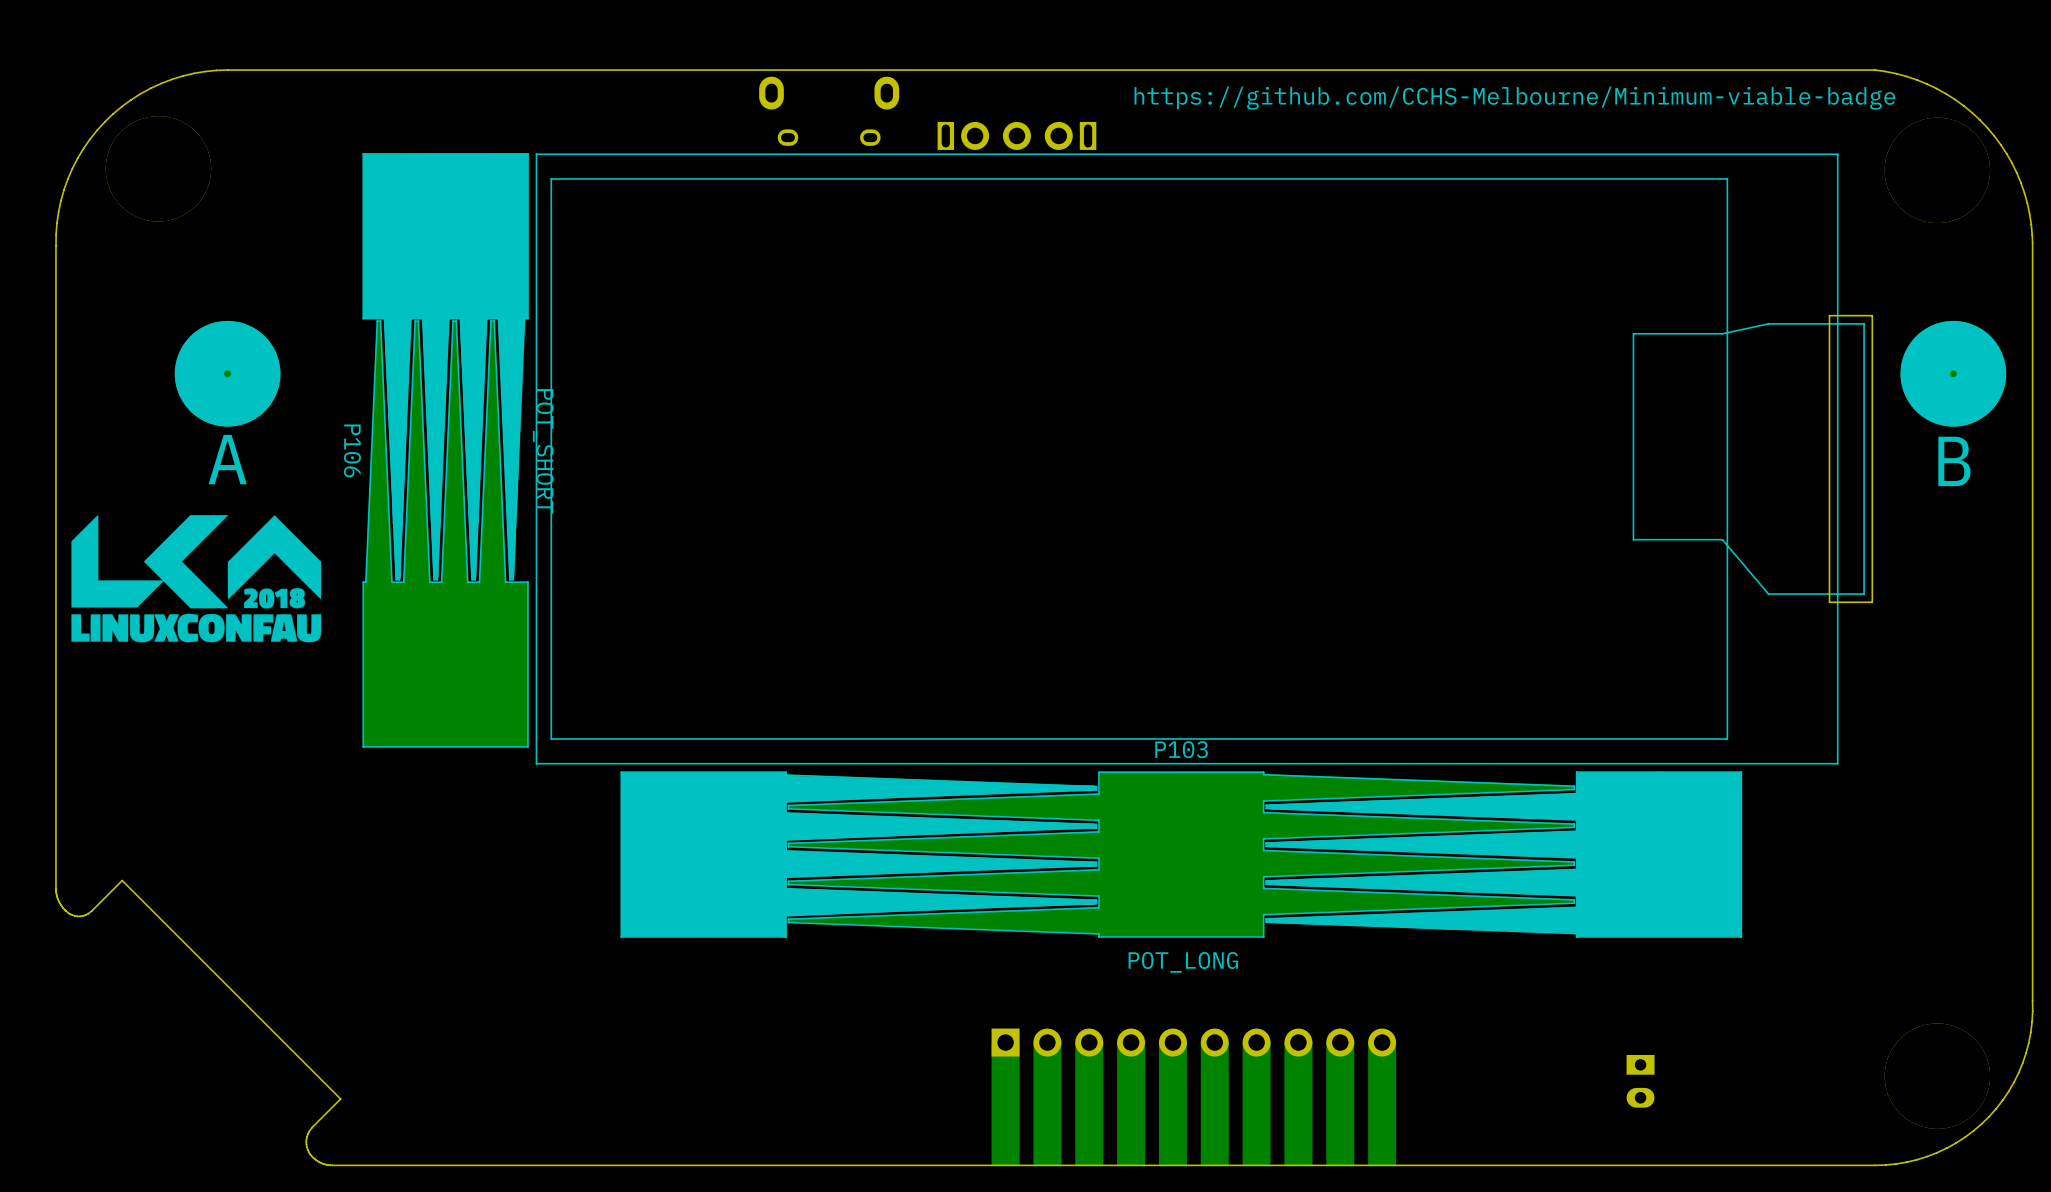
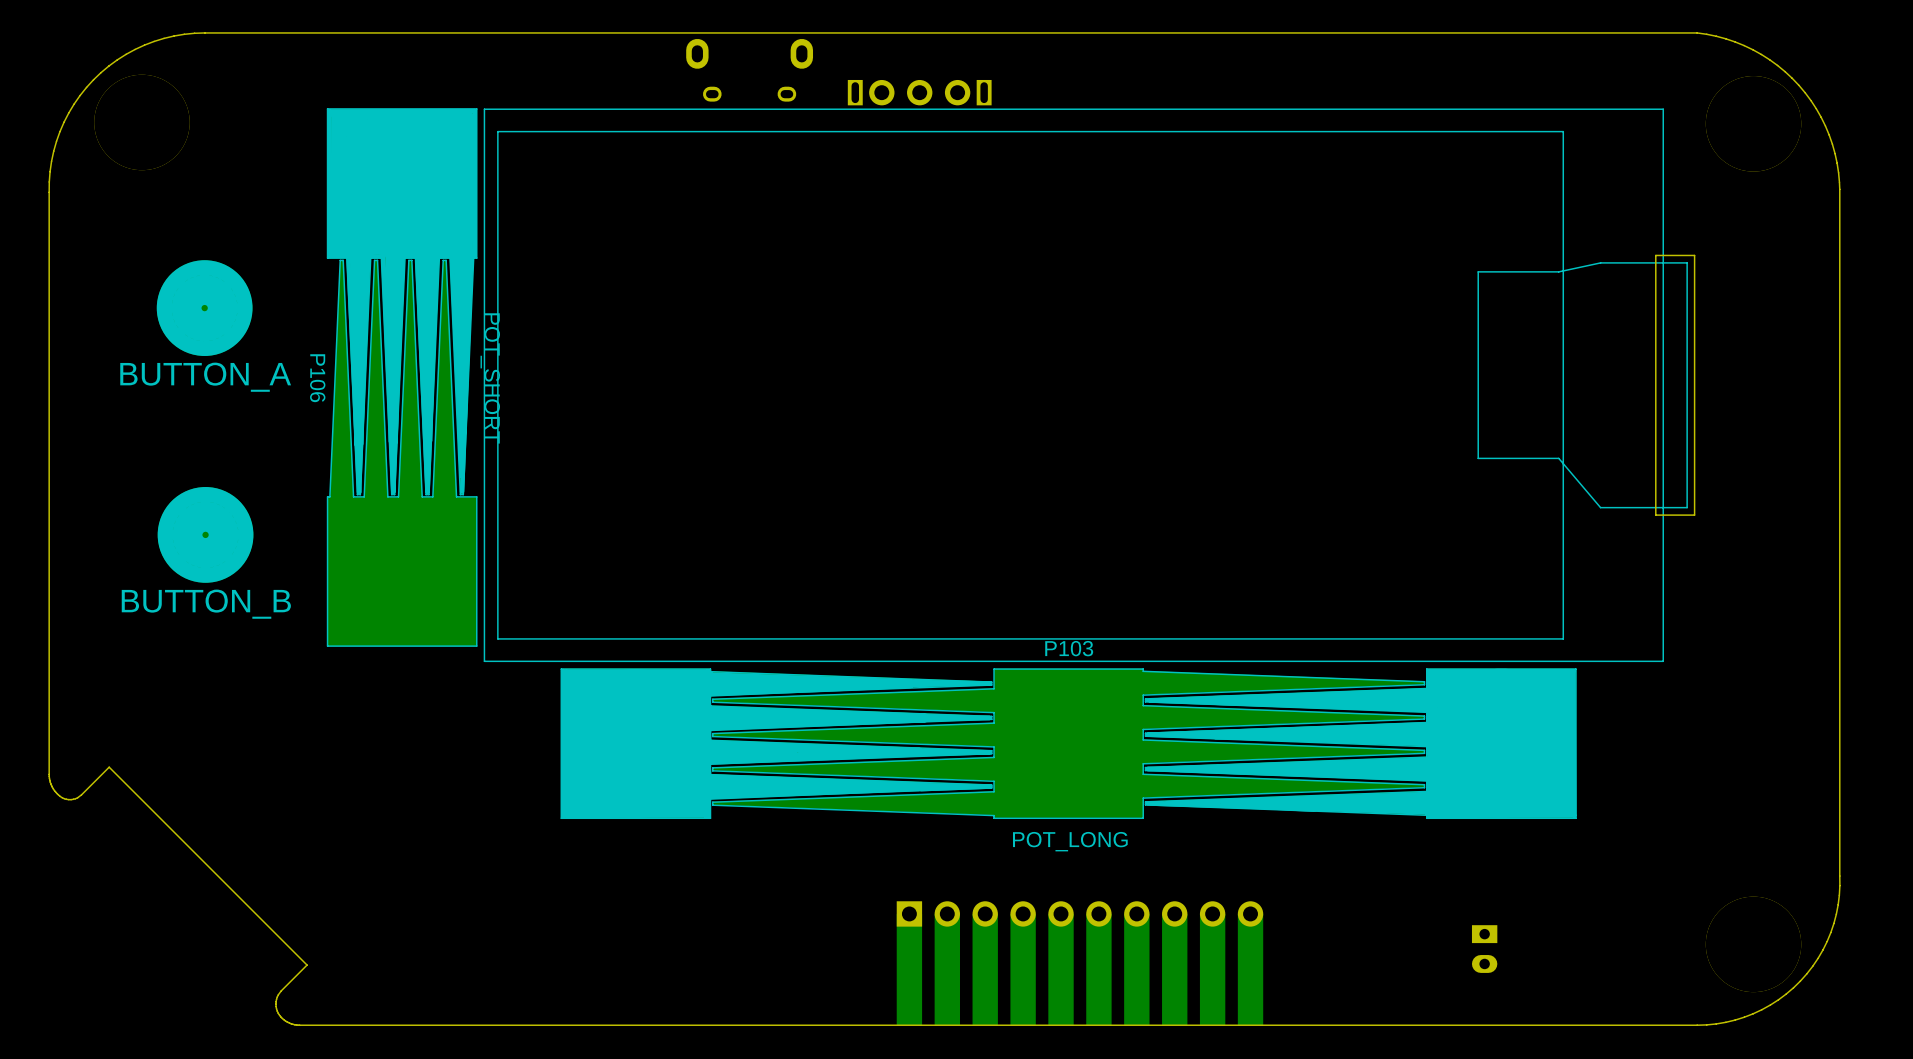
text: https://github.com/CCHS-Melbourne/Minimum-viable-badge (1514, 98) -> none
part: B (1953, 373) -> none
part value: A (227, 459) -> BUTTON_A (205, 377)
drawing: [71, 515, 322, 643] -> none
part: none -> BUTTON_B (205, 534)

